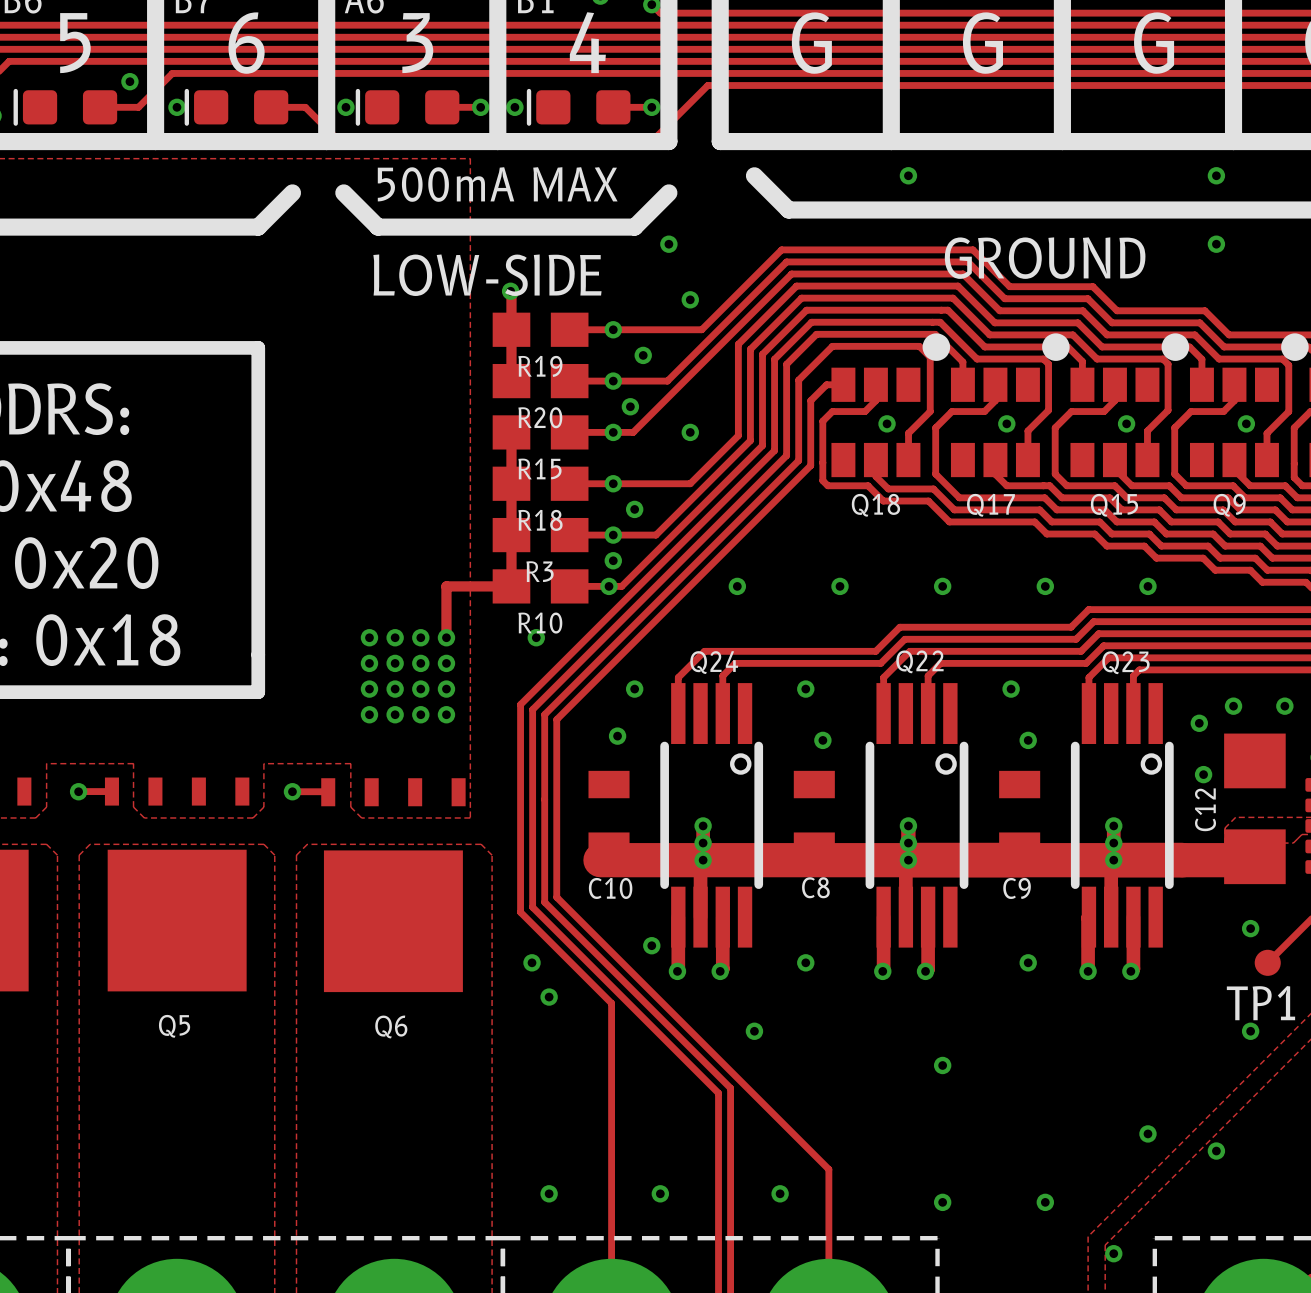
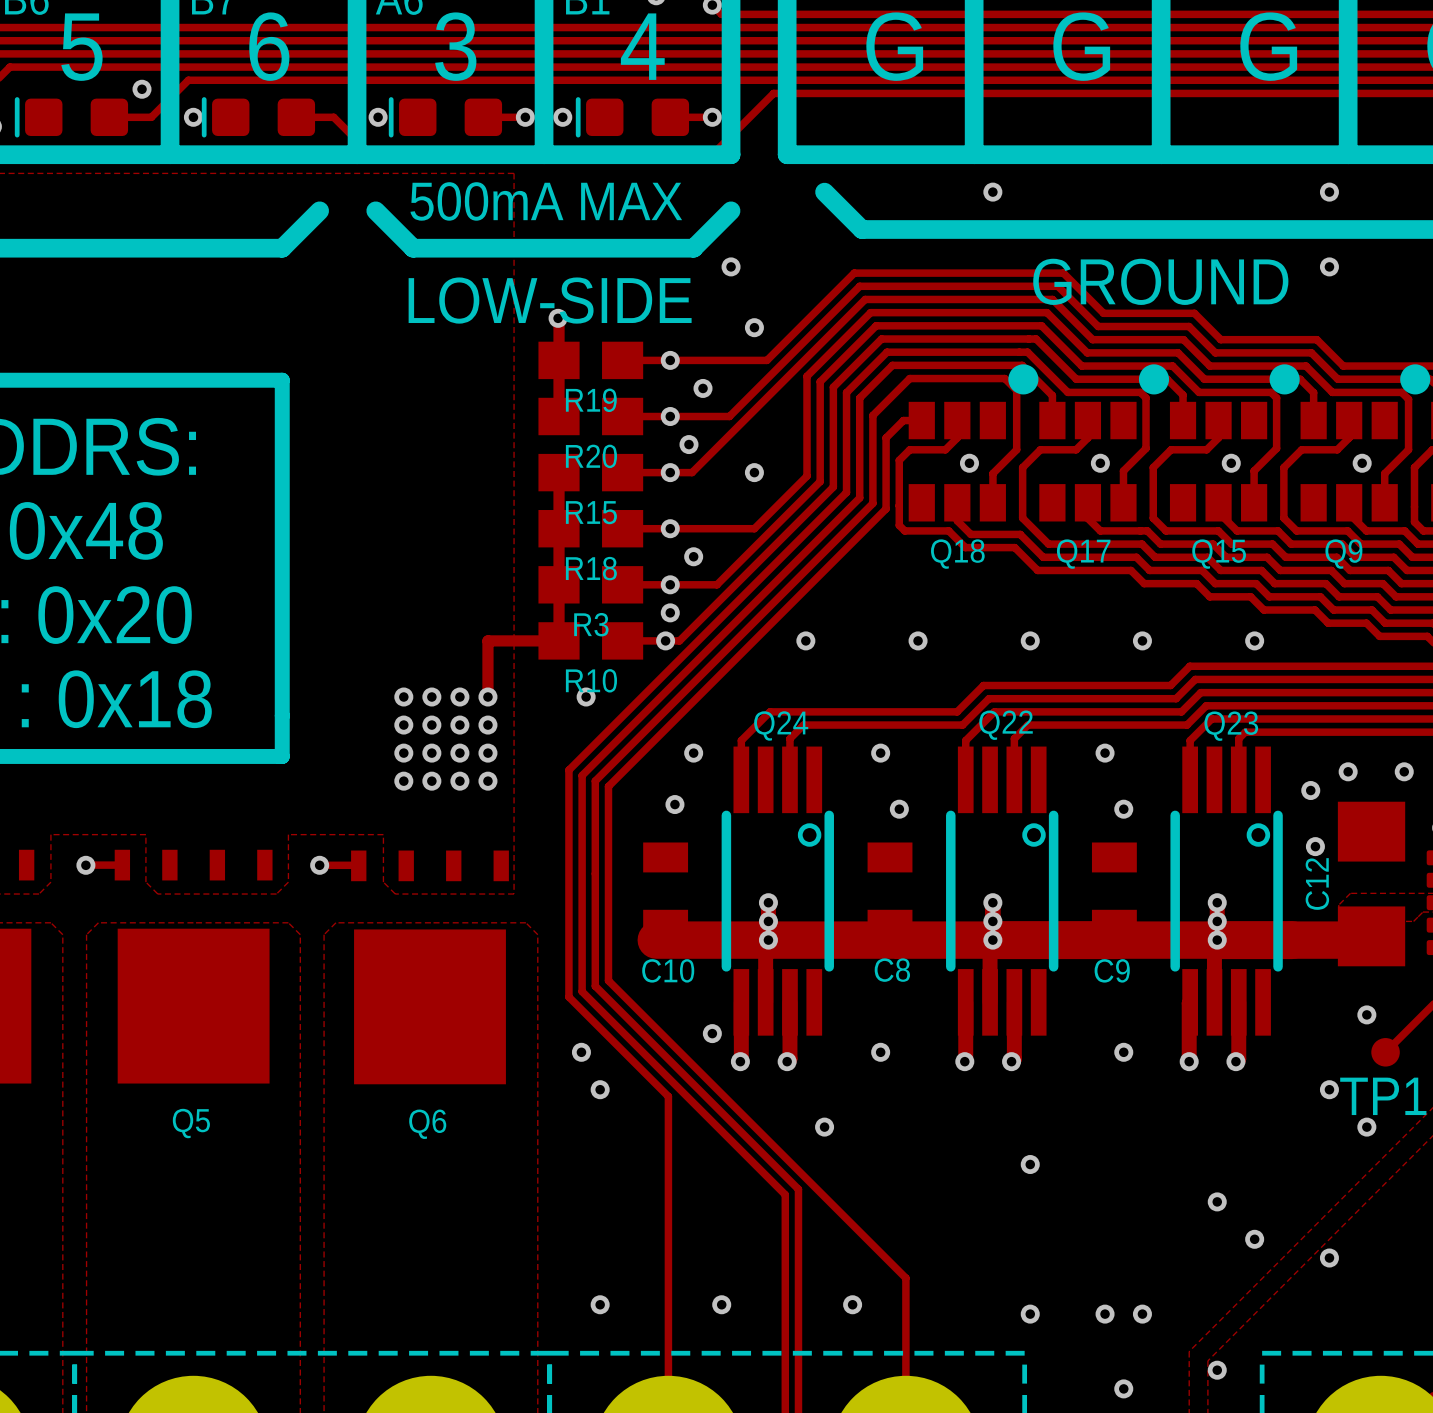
via: none -> (1329, 1089)
via: none -> (1217, 1201)
via: none -> (1105, 1314)
via: none -> (1123, 1388)

